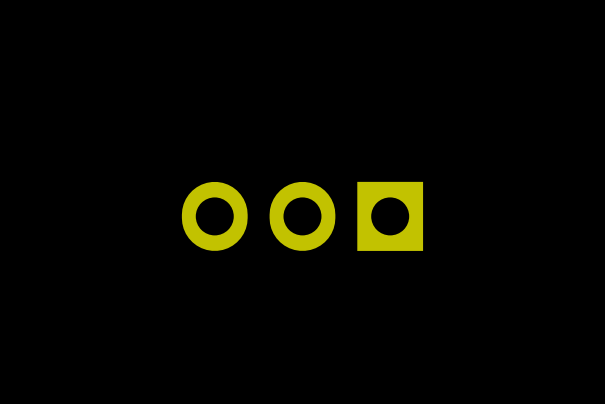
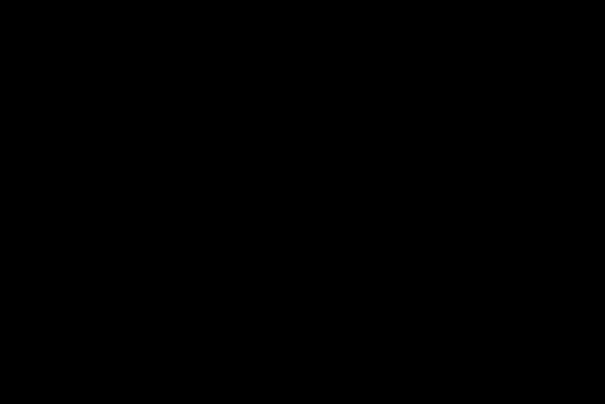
part: (302, 216) -> none

